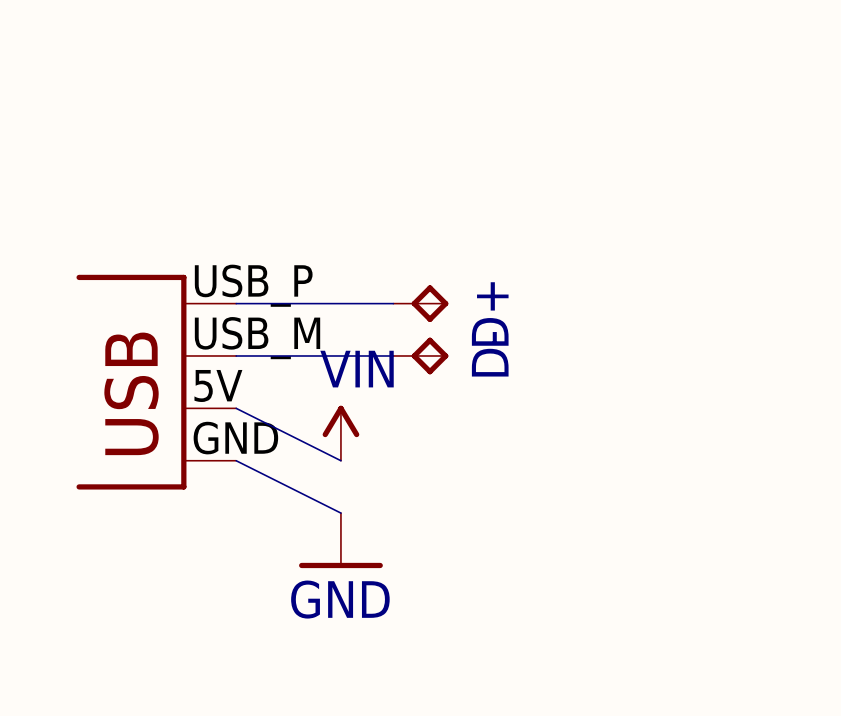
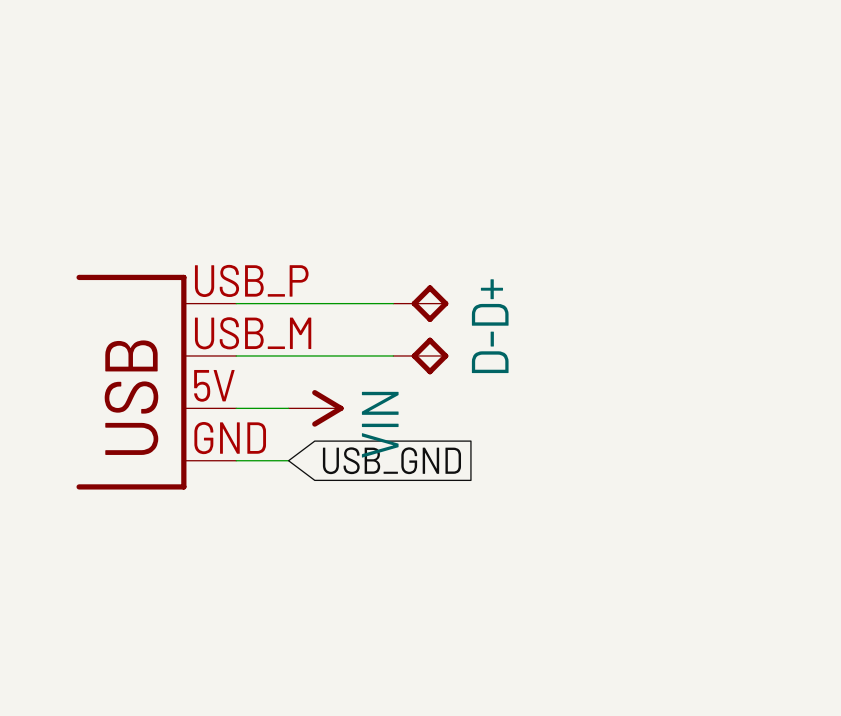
wire: (236, 408) (340, 460) -> (236, 408) (288, 408)
power symbol rotation: 0° (340, 421) -> 90° clockwise (327, 408)
power symbol position: VIN (340, 433) -> VIN (316, 408)
wire: (236, 460) (340, 513) -> (236, 460) (288, 460)
global label: none -> USB_GND (391, 460)
power symbol: GND (340, 540) -> none

